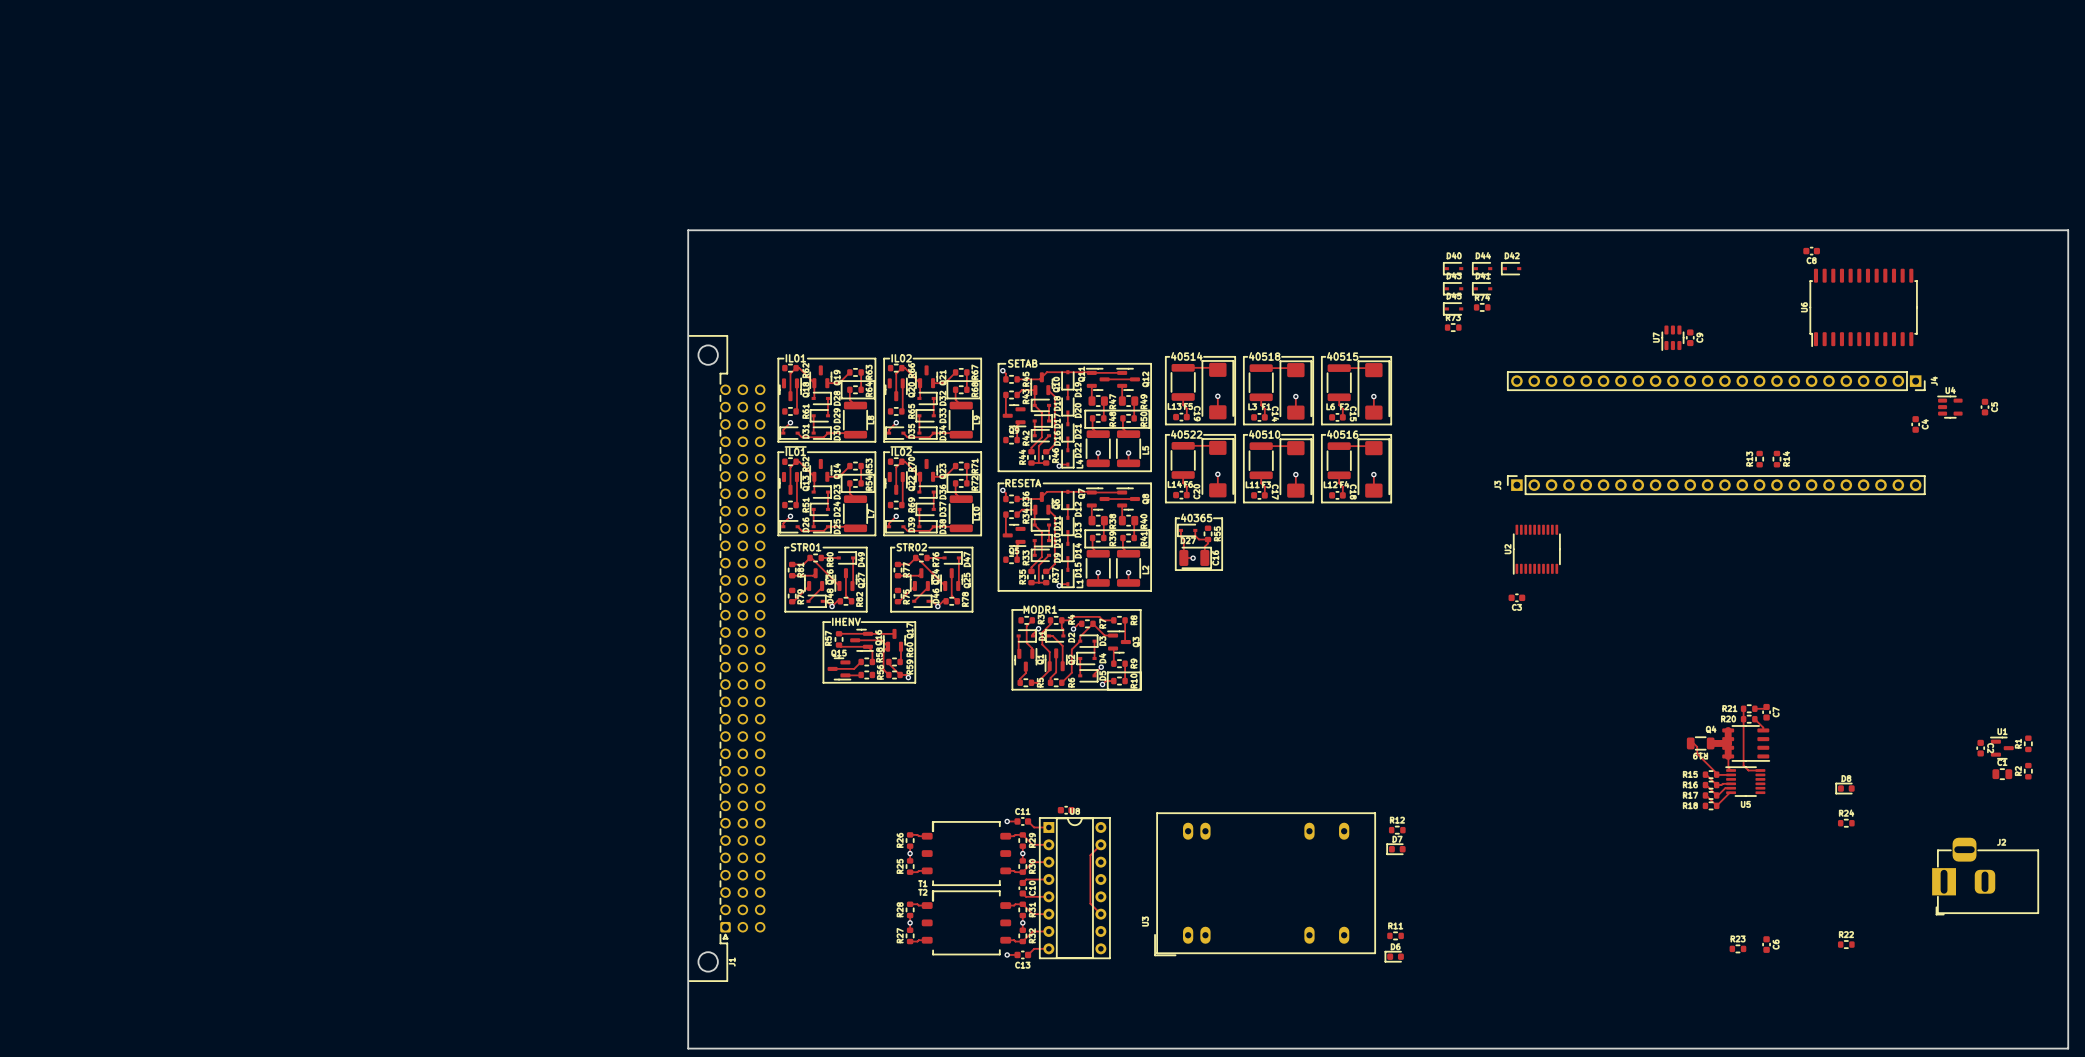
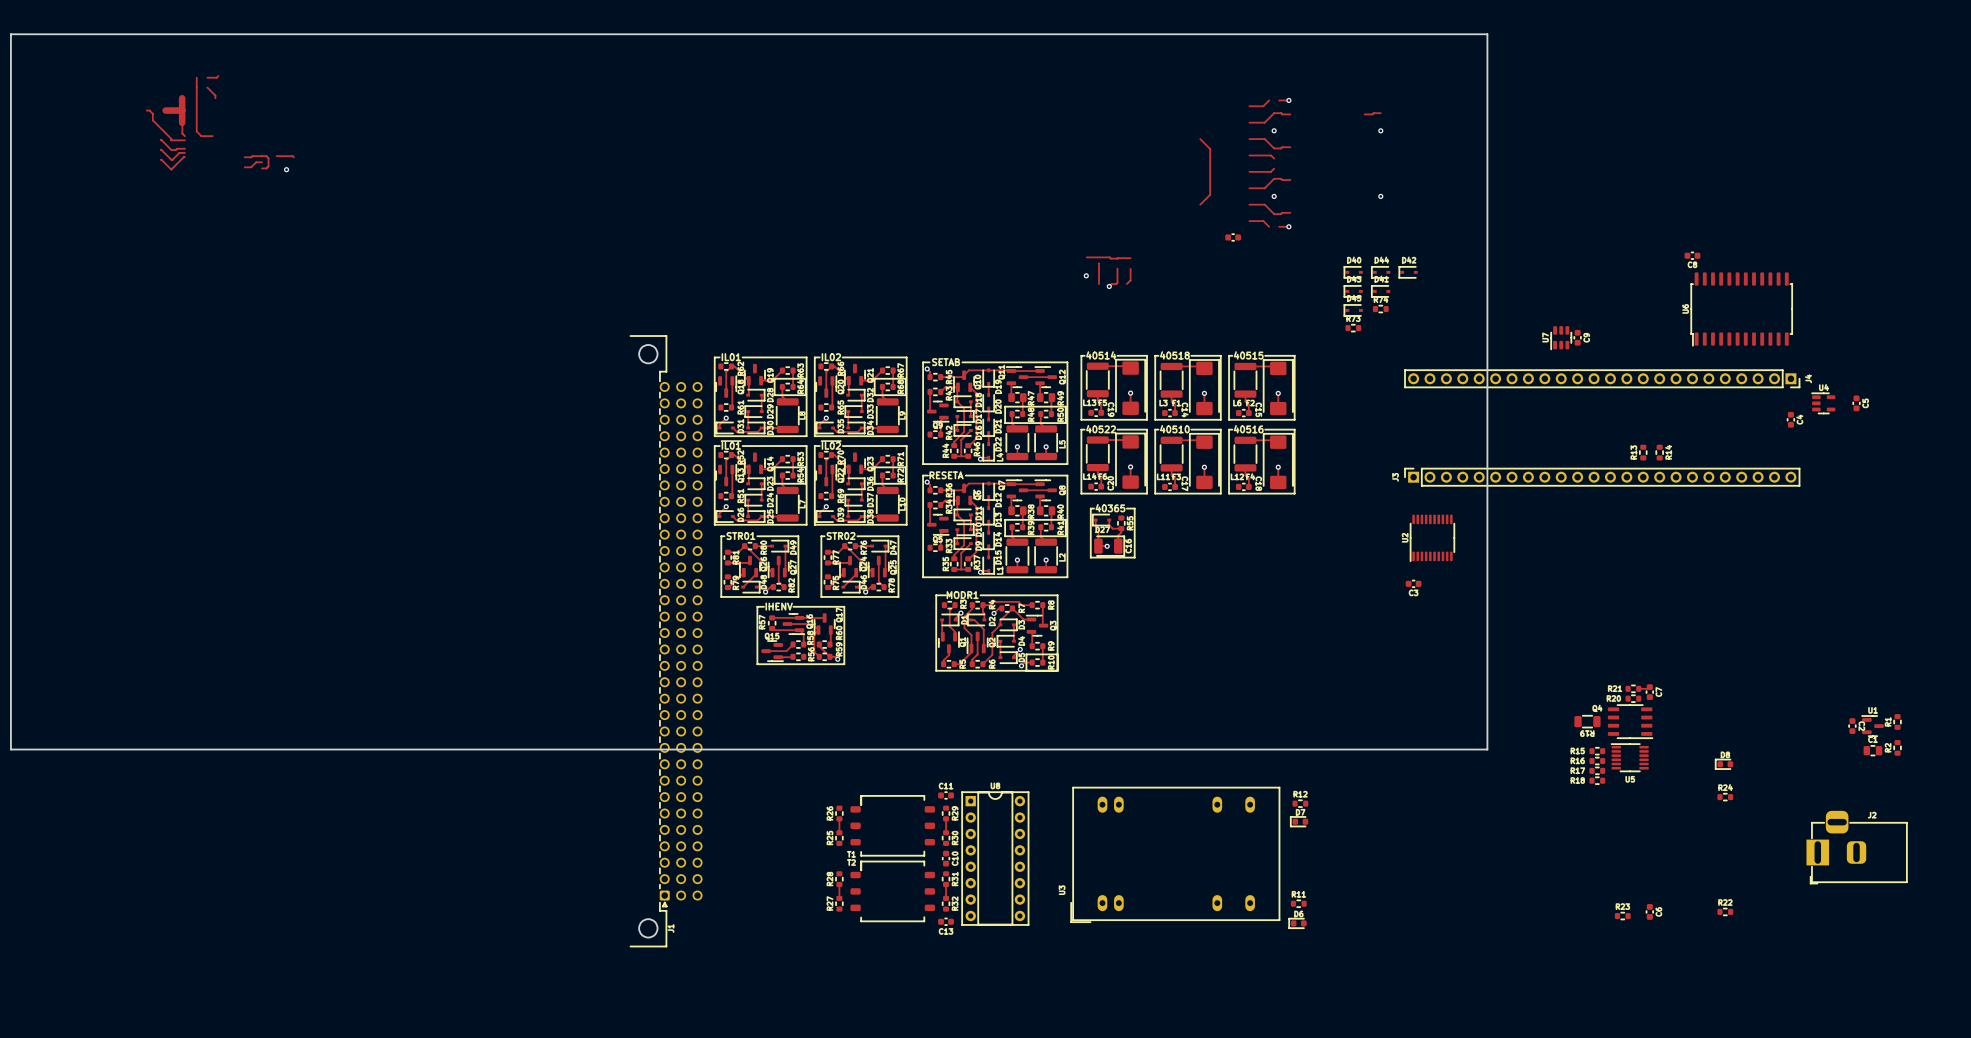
board edge: none -> (10, 34) (1487, 34) (1487, 749) (10, 749) (10, 34)
top track: none -> (218, 76) (207, 77)
top track: none -> (196, 77) (196, 131) (201, 136) (212, 136)
top track: none -> (207, 87) (215, 95) (215, 98)
top track: none -> (182, 98) (182, 133) (184, 136)
top track: none -> (1269, 100) (1263, 106) (1249, 106)
top track: none -> (1279, 100) (1288, 100)
via: none -> (1288, 100)
top track: none -> (146, 110) (152, 113) (152, 120) (171, 140) (184, 140)
top track: none -> (182, 110) (165, 110)
top track: none -> (1380, 113) (1364, 114)
top track: none -> (1290, 114) (1274, 113) (1264, 122) (1249, 122)
via: none -> (1274, 130)
via: none -> (1380, 130)
top track: none -> (1200, 139) (1210, 148) (1210, 194) (1200, 204)
top track: none -> (1249, 139) (1264, 139) (1274, 148) (1290, 147)
top track: none -> (160, 140) (171, 149) (184, 148)
top track: none -> (160, 149) (171, 159) (179, 152) (184, 152)
top track: none -> (276, 156) (293, 157)
top track: none -> (1249, 155) (1271, 155) (1274, 158)
top track: none -> (184, 157) (171, 169) (160, 159)
top track: none -> (244, 157) (266, 156) (268, 158) (268, 166) (261, 168)
top track: none -> (261, 162) (256, 162) (251, 167) (244, 167)
top track: none -> (1274, 168) (1270, 171) (1249, 171)
via: none -> (286, 169)
top track: none -> (1290, 180) (1274, 178) (1264, 188) (1249, 188)
via: none -> (1274, 196)
via: none -> (1380, 196)
top track: none -> (1249, 204) (1264, 204) (1274, 214) (1290, 212)
top track: none -> (1249, 221) (1263, 221) (1269, 226)
top track: none -> (1279, 226) (1288, 226)
via: none -> (1288, 226)
board edge: (688, 230) (2068, 230) (2068, 1048) (688, 1048) (688, 230) -> none
part: none -> (1233, 237)
top track: none -> (1086, 257) (1130, 258)
top track: none -> (1099, 263) (1099, 284)
top track: none -> (1117, 268) (1117, 282) (1109, 286)
top track: none -> (1130, 268) (1130, 280) (1126, 284)
via: none -> (1086, 275)
via: none -> (1109, 286)
top track: (1743, 708) (1743, 765) (1748, 770) (1760, 770) -> none
top track: (1754, 719) (1763, 727) (1763, 730) -> none
top track: (1728, 730) (1728, 767) (1731, 770) -> none
top track: (1690, 743) (1697, 746) (1697, 753) (1716, 774) (1731, 774) -> none
top track: (1728, 743) (1710, 743) -> none
top track: (1705, 774) (1716, 785) (1731, 783) -> none
top track: (1705, 785) (1716, 795) (1725, 788) (1731, 788) -> none
top track: (1731, 792) (1716, 805) (1705, 795) -> none
part: (1066, 810) -> none
top track: (1007, 821) (1017, 821) -> none
via: (1007, 821) -> none
top track: (1028, 821) (1034, 827) (1048, 827) -> none
top track: (910, 834) (927, 836) -> none
top track: (1005, 836) (1022, 834) (1032, 844) (1048, 844) -> none
top track: (1100, 844) (1090, 855) (1090, 903) (1100, 914) -> none
via: (910, 853) -> none
via: (1022, 853) -> none
top track: (1048, 862) (1032, 862) (1022, 872) (1005, 870) -> none
top track: (927, 870) (910, 872) -> none
top track: (1048, 879) (1026, 879) (1022, 882) -> none
top track: (1022, 893) (1026, 896) (1048, 896) -> none
top track: (910, 904) (927, 905) -> none
top track: (1005, 905) (1022, 904) (1032, 914) (1048, 914) -> none
via: (910, 922) -> none
via: (1022, 922) -> none
top track: (1048, 931) (1032, 931) (1022, 941) (1005, 940) -> none
top track: (927, 940) (910, 941) -> none
top track: (1048, 948) (1034, 948) (1028, 954) -> none
top track: (1007, 954) (1017, 954) -> none
via: (1007, 954) -> none

